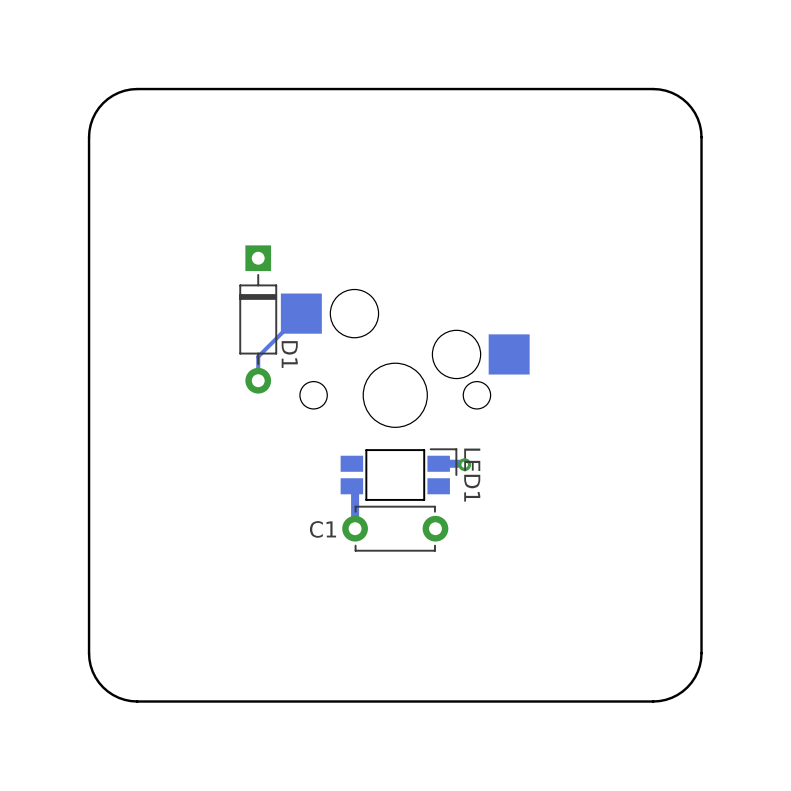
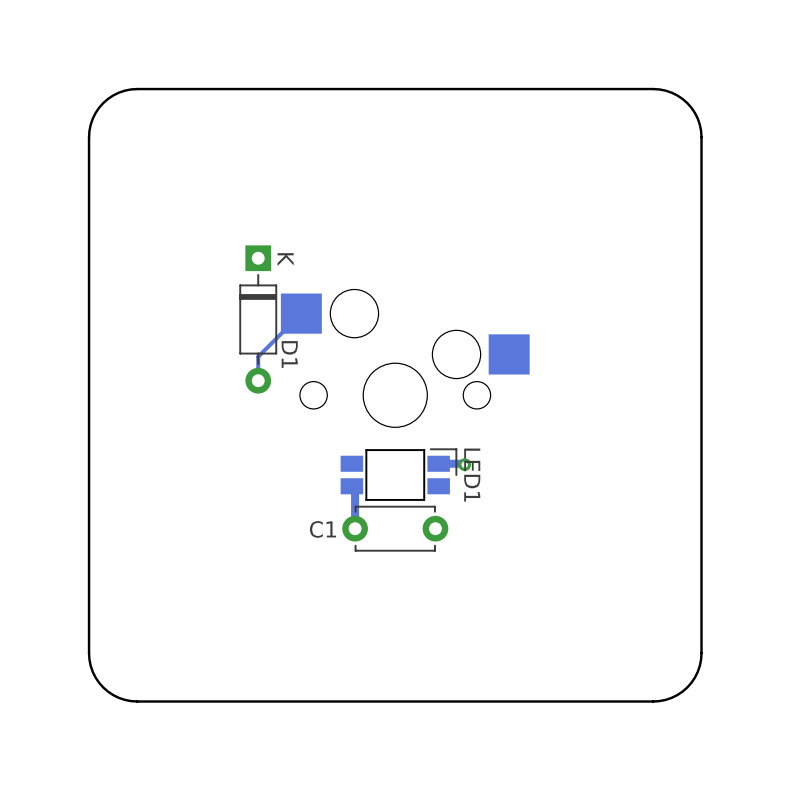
D1 text: none -> K (285, 259)

